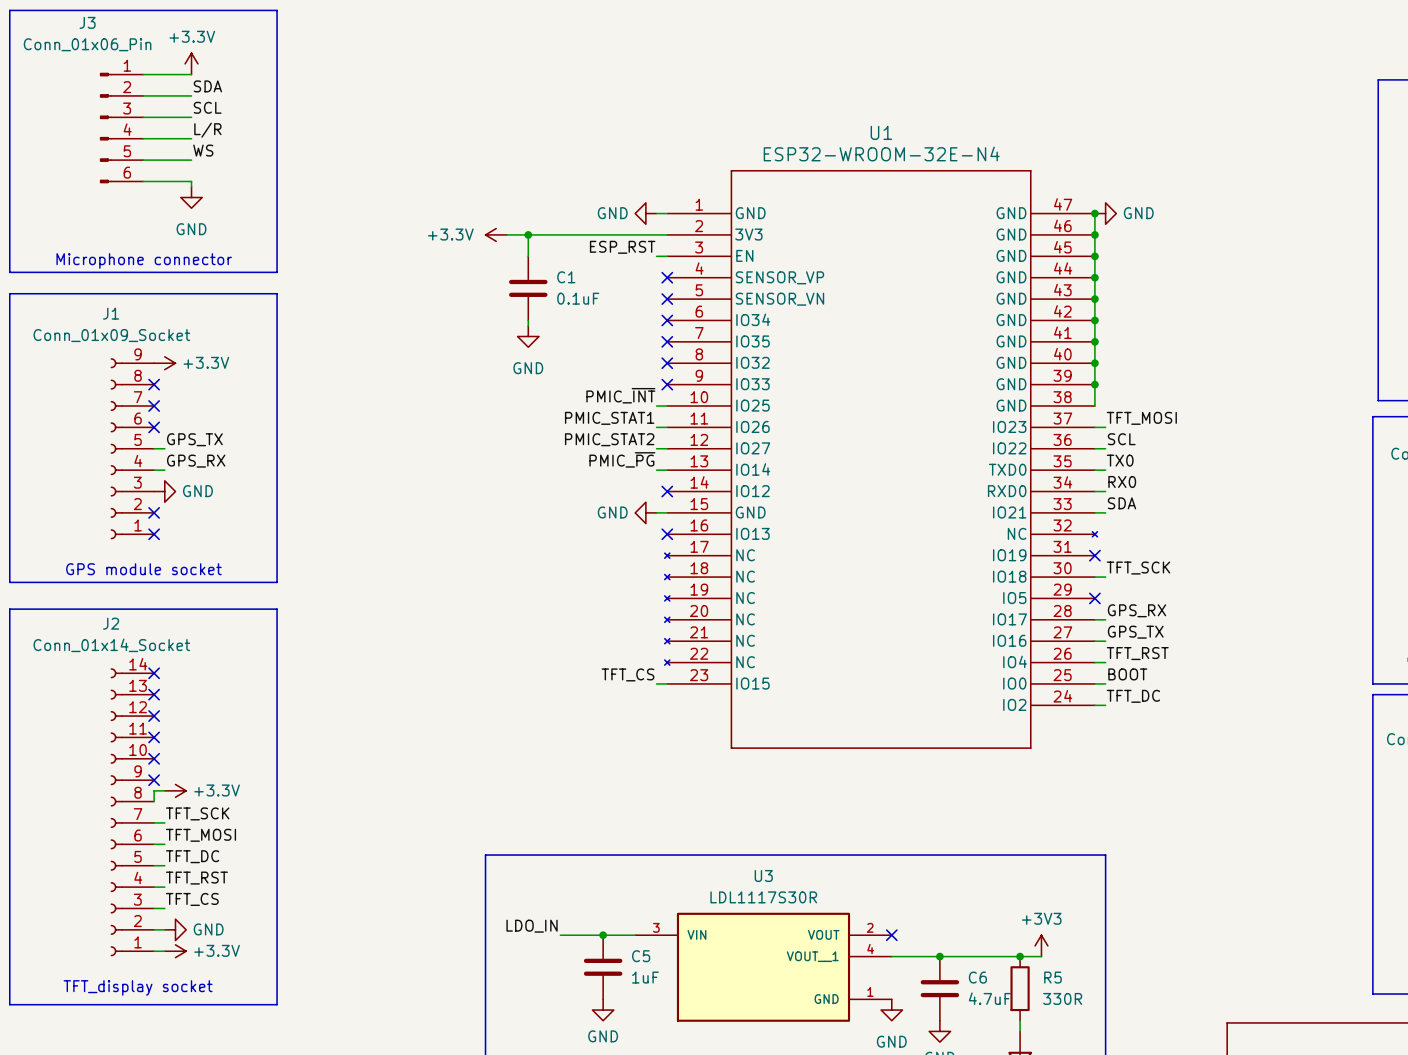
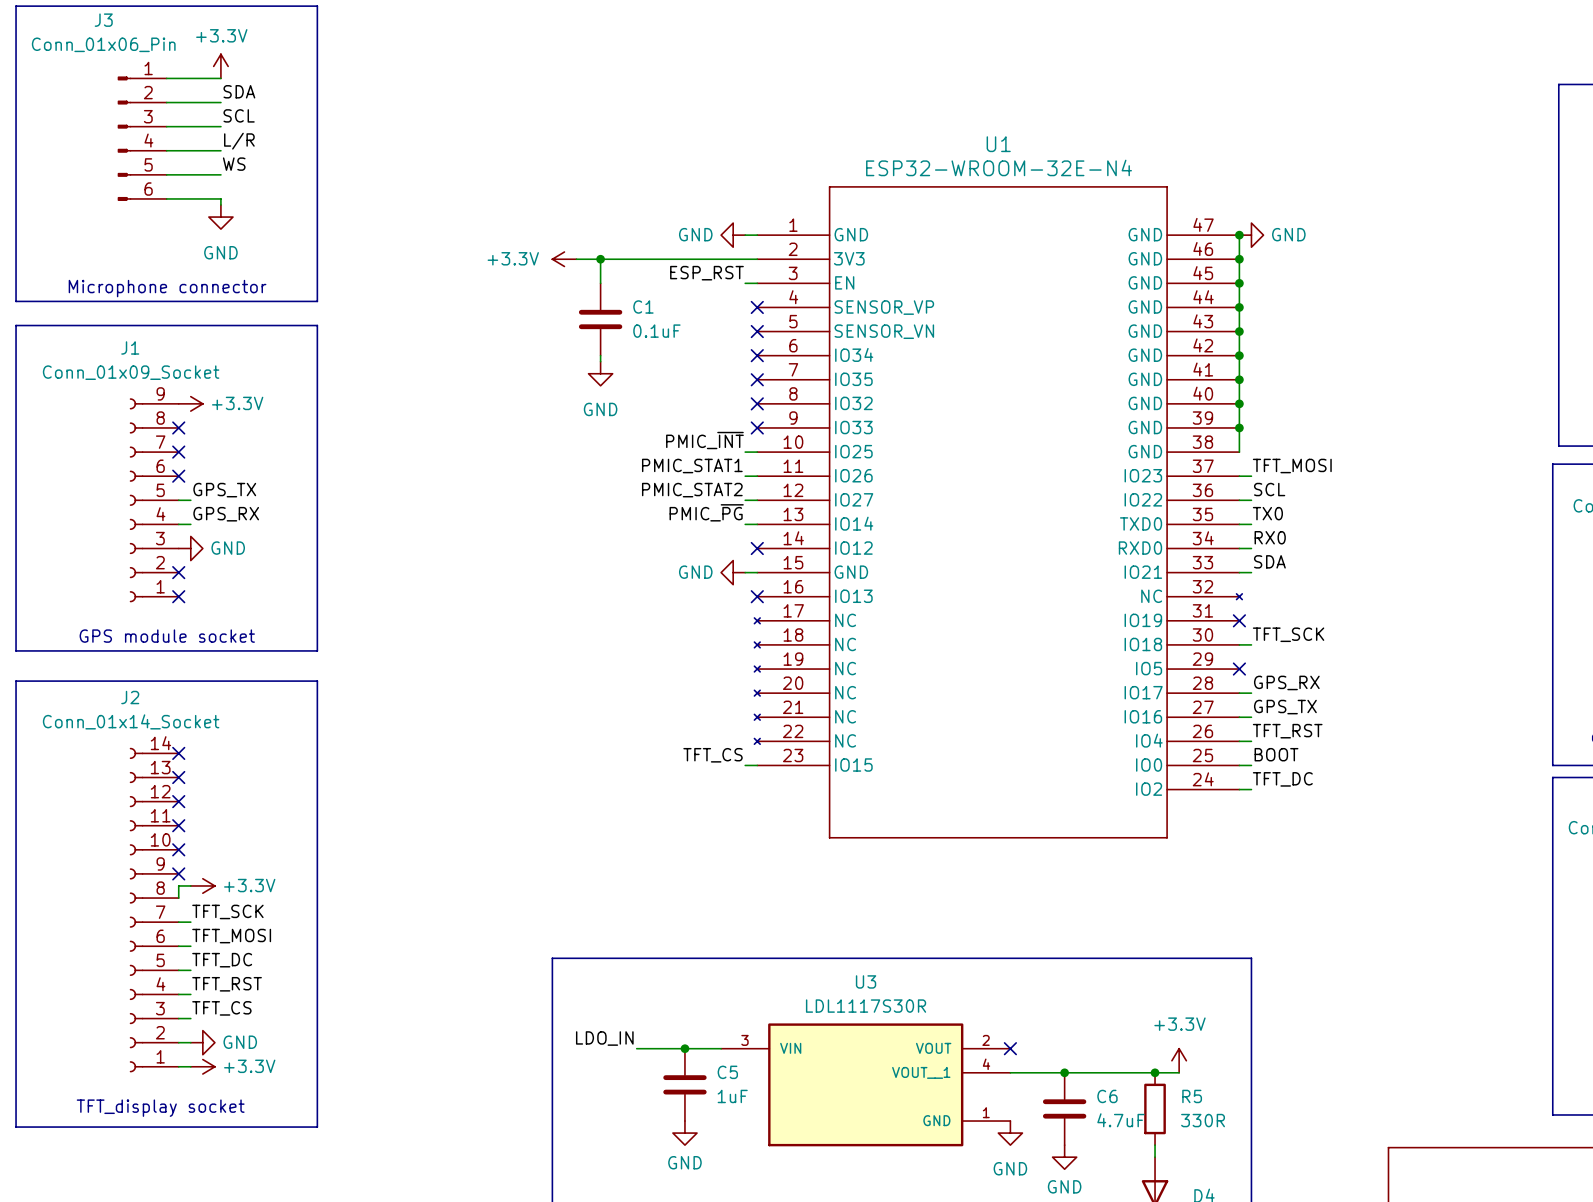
power symbol: +3V3 (1041, 945) -> +3.3V (1179, 1060)

